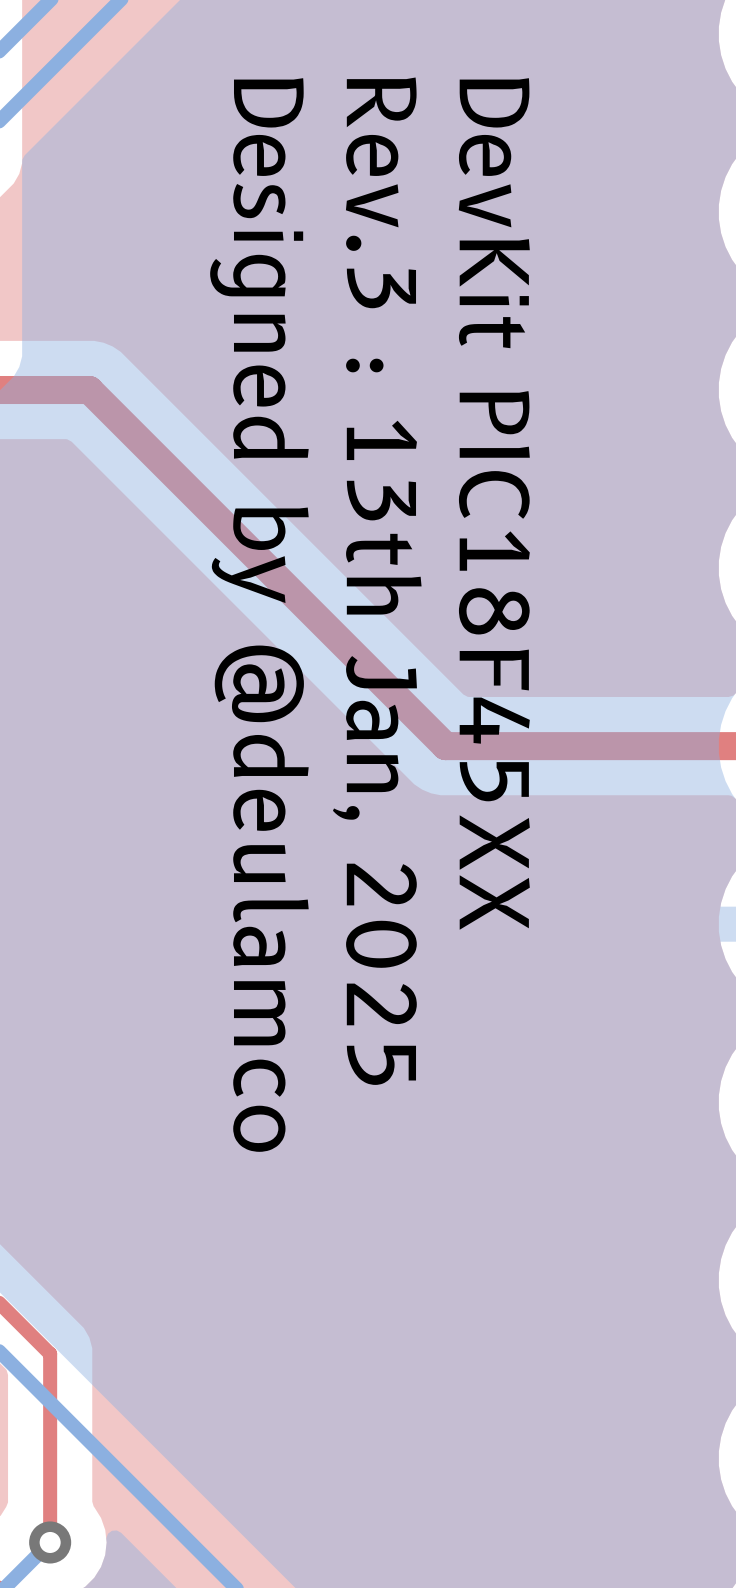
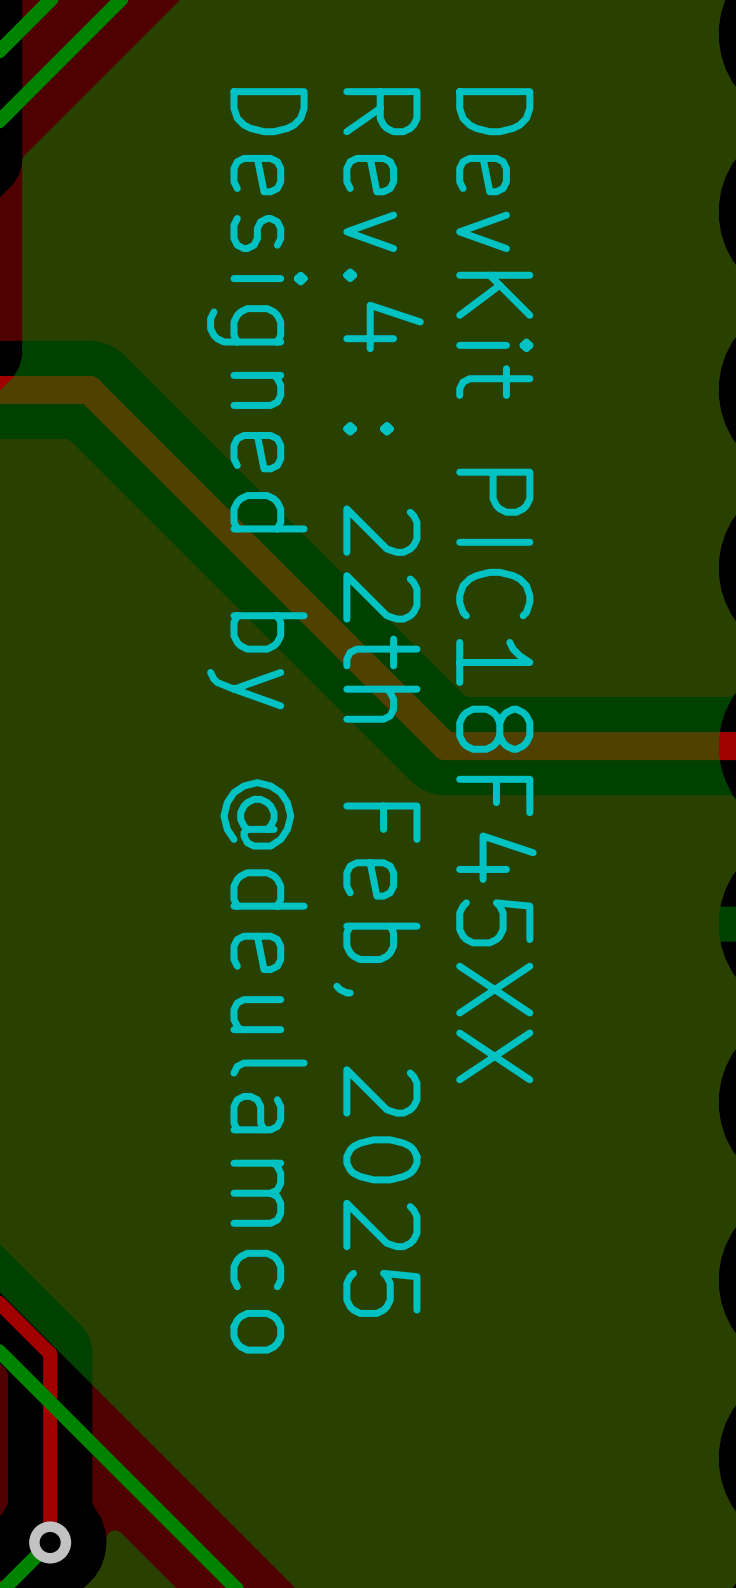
text: Rev.3 : 13th Jan, 2025 (377, 581) -> Rev.4 : 22th Feb, 2025 (378, 702)

